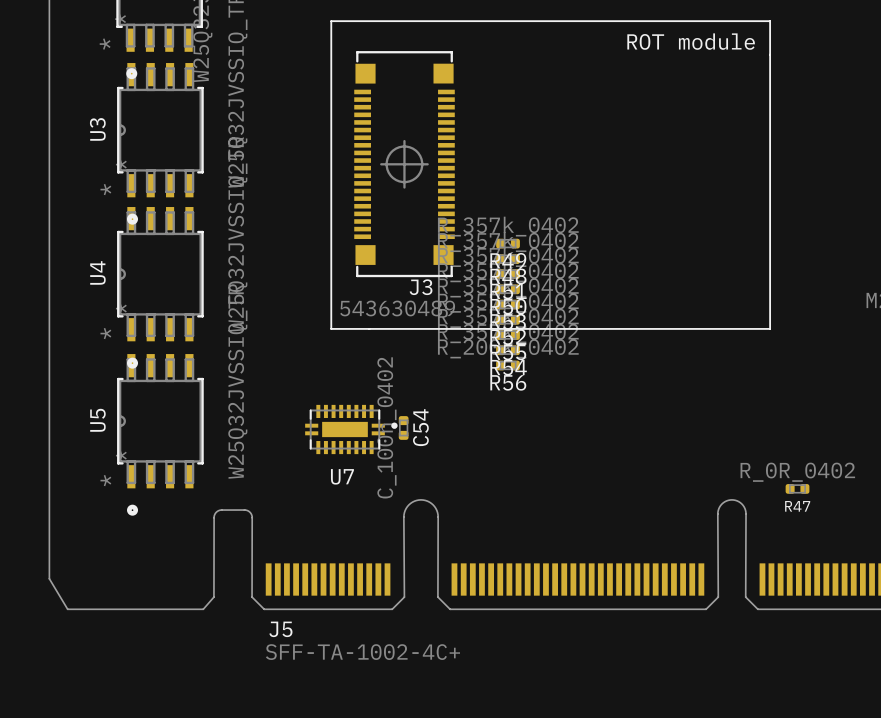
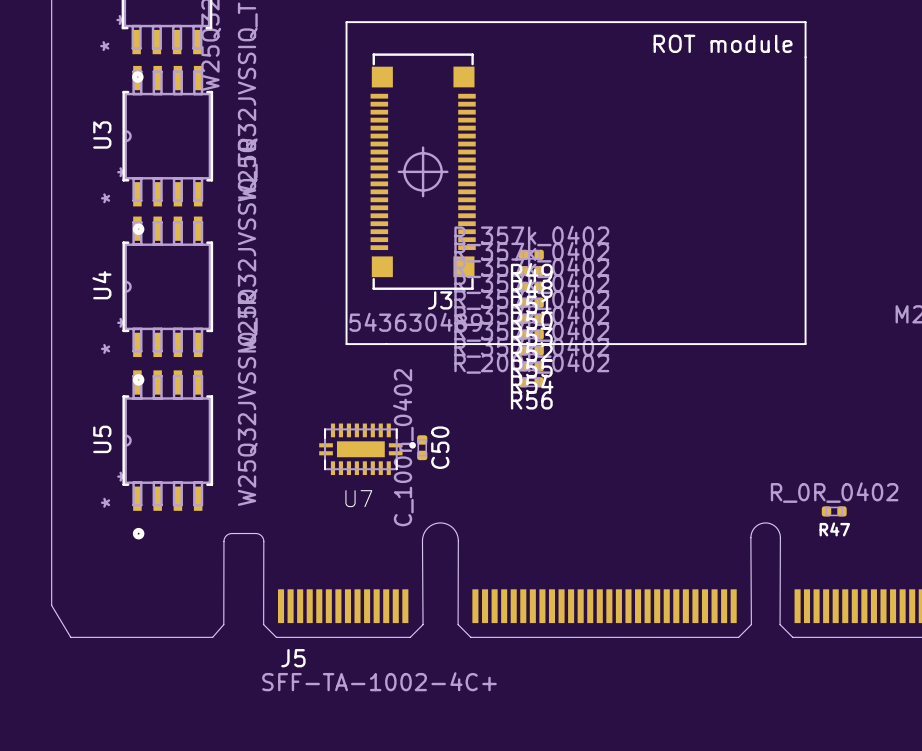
C54 name: C54 (420, 427) -> C50 (440, 447)

